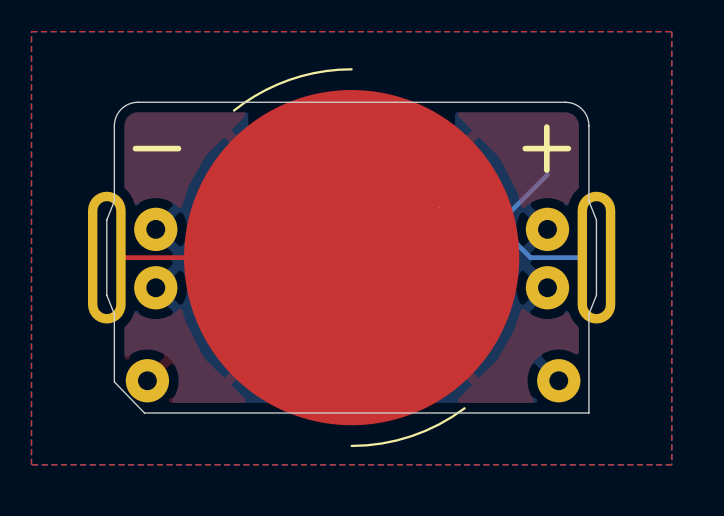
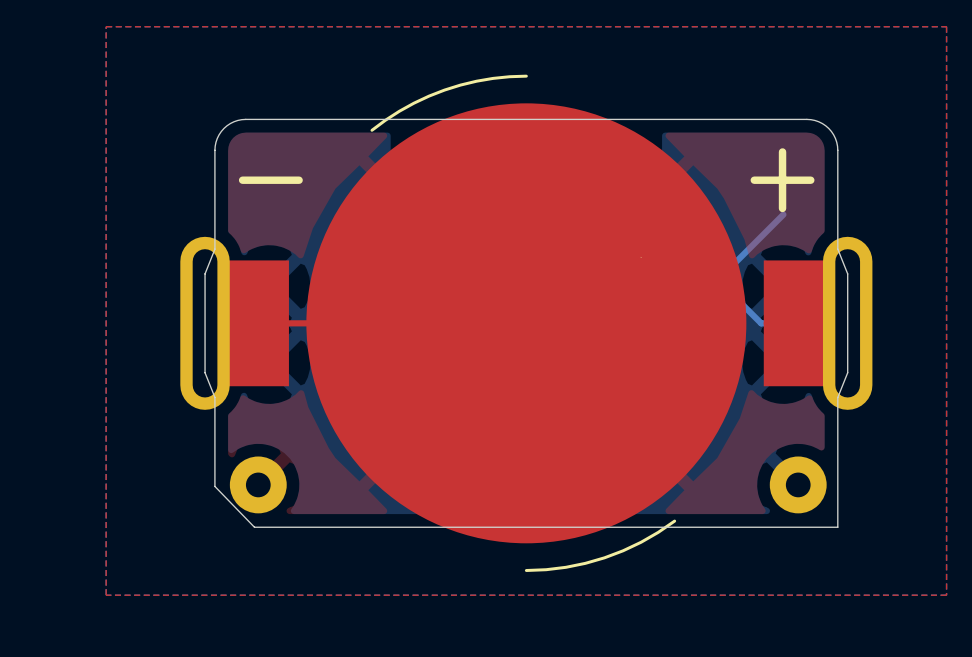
part footprint: [134, 90, 570, 426] -> [219, 103, 833, 544]

